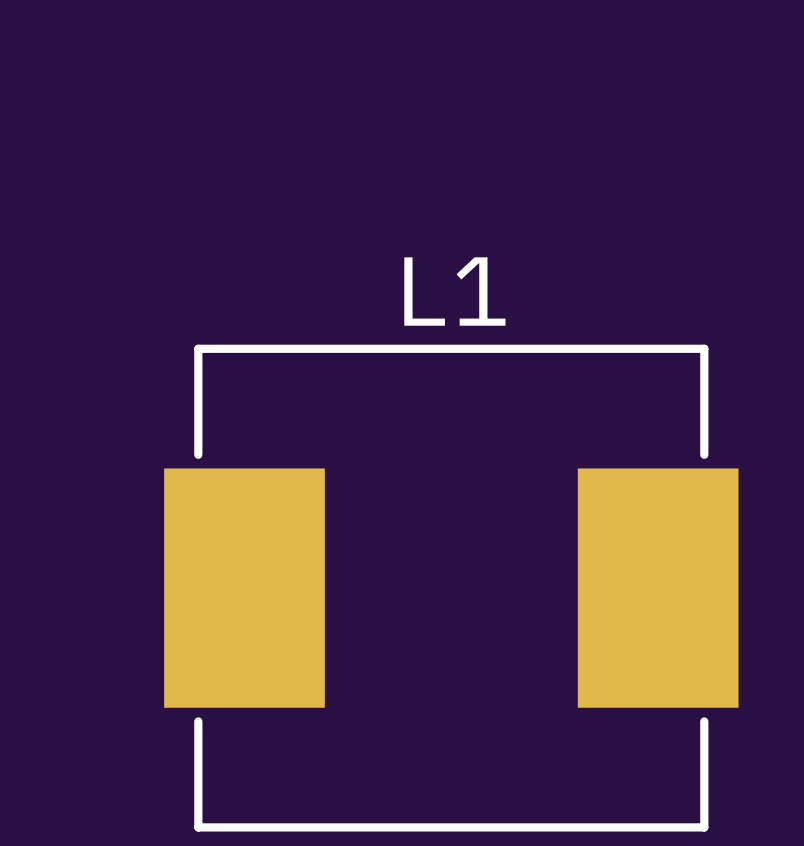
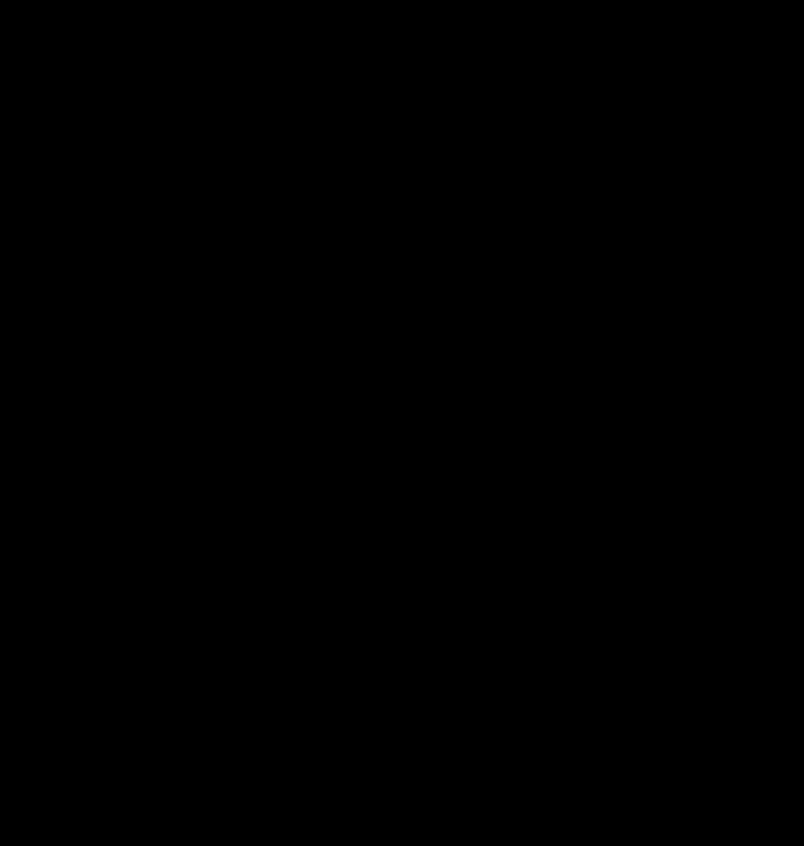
L1: (451, 588) -> none

